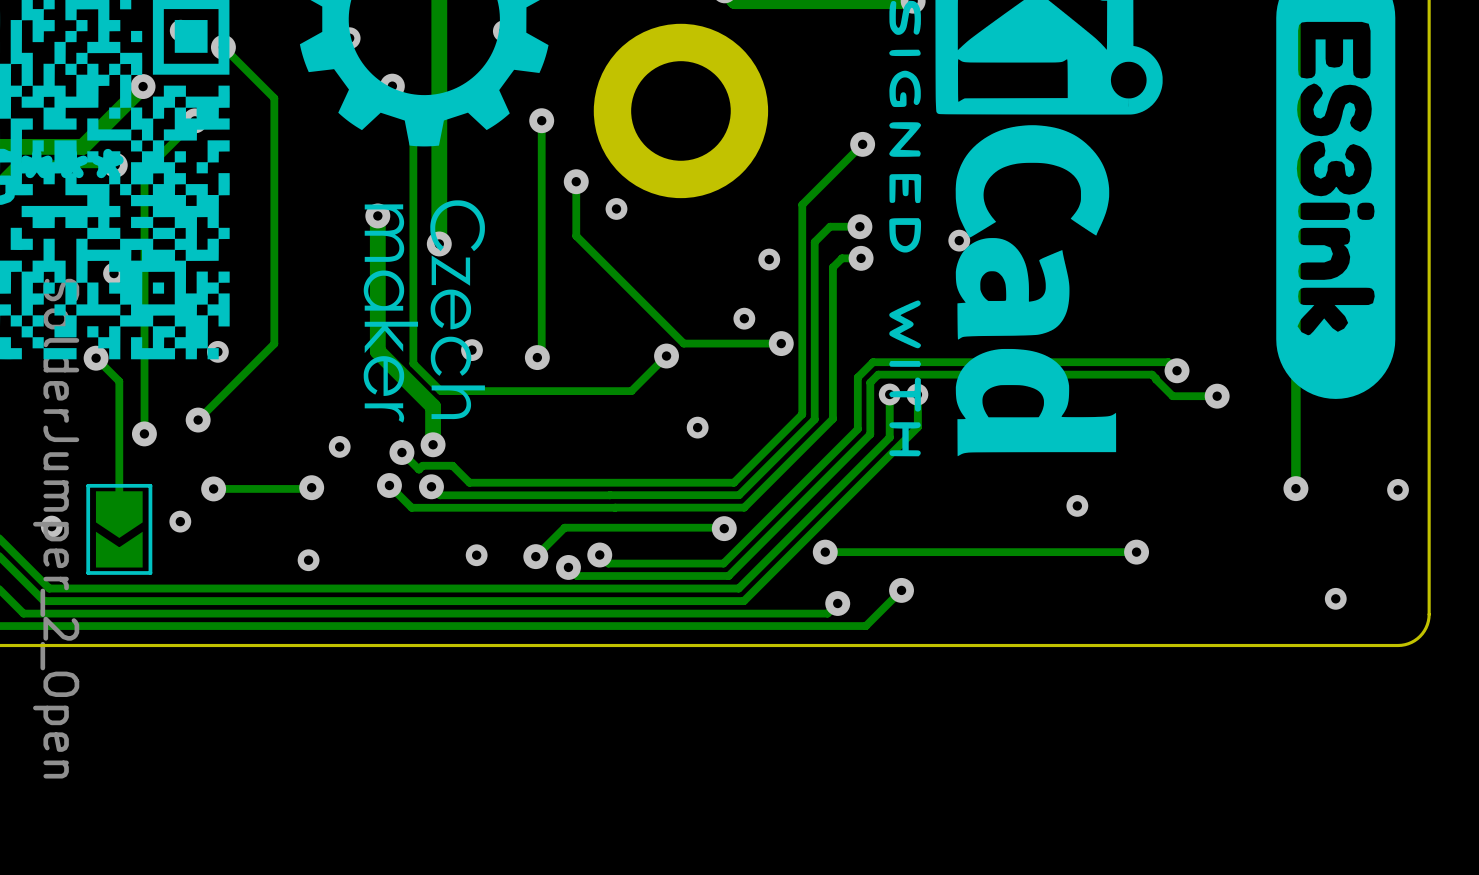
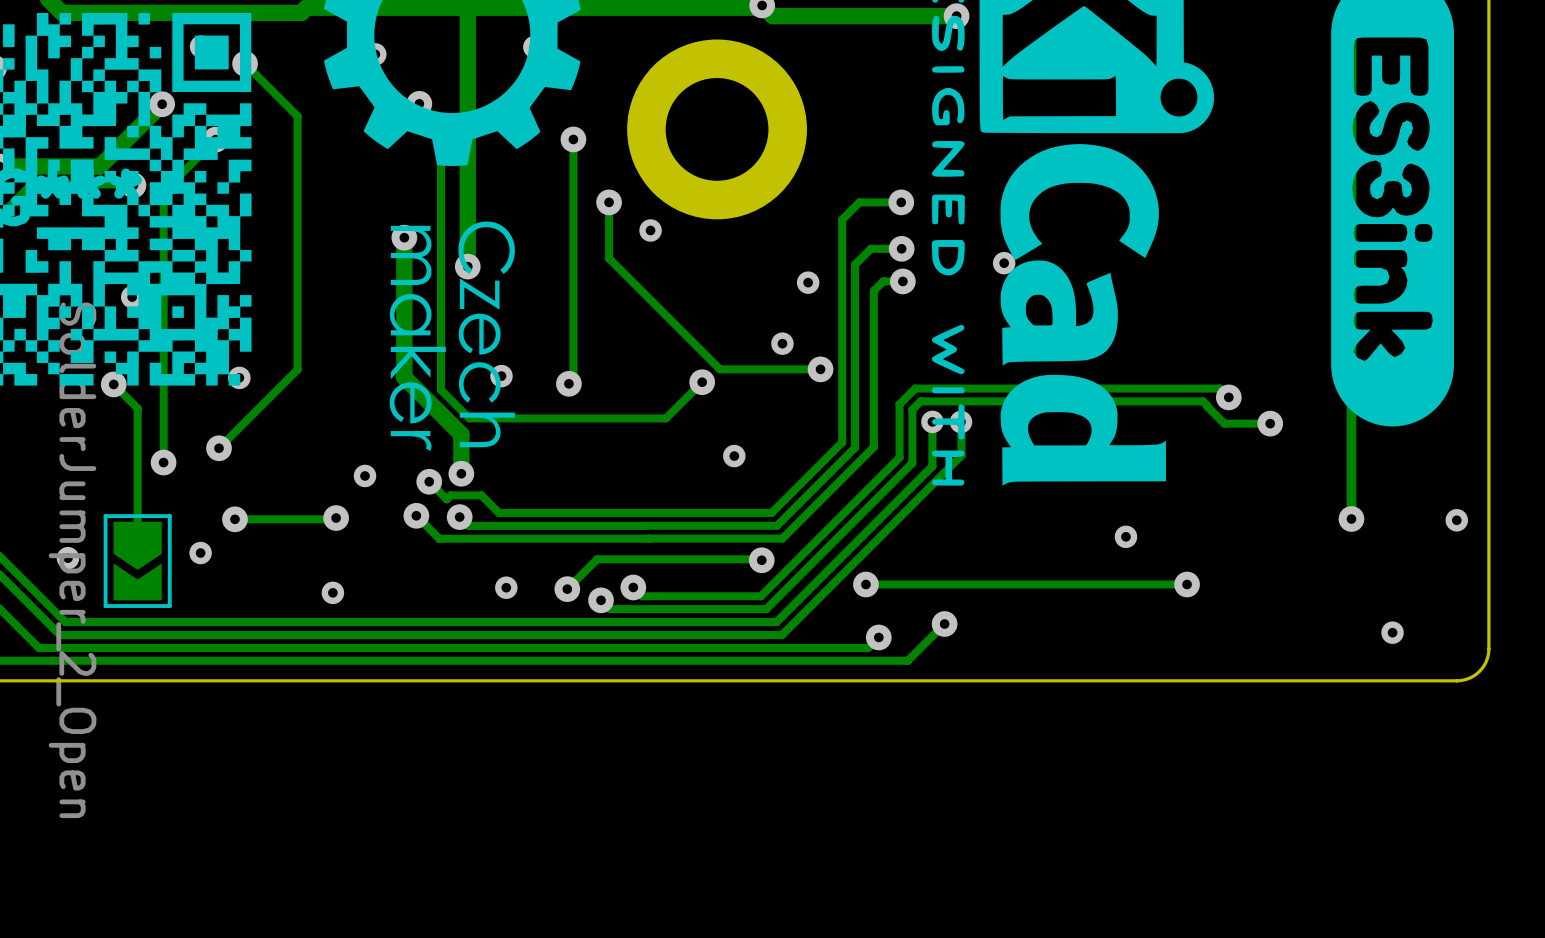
track: (862, 144) (802, 204) -> (901, 202) (859, 202) (842, 219) (842, 226)
via position: (862, 144) -> (901, 202)

